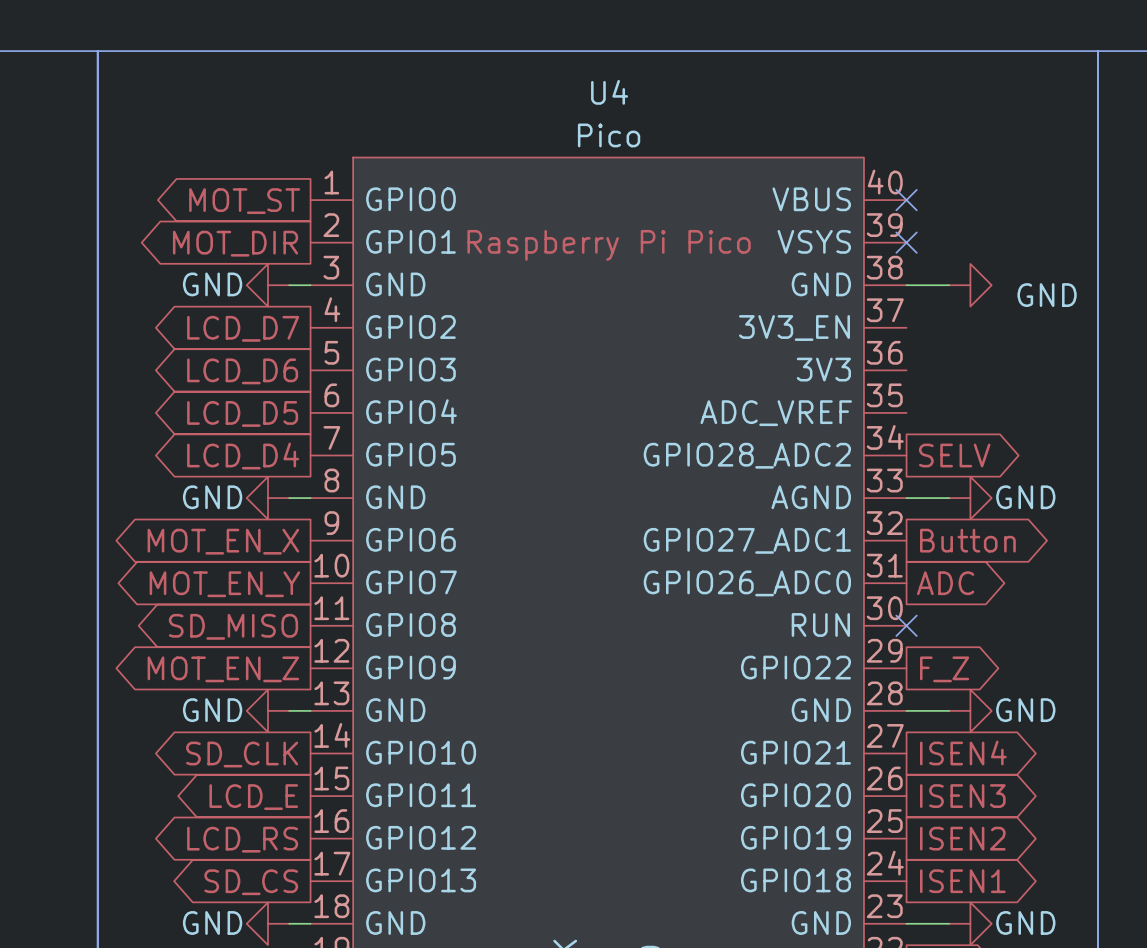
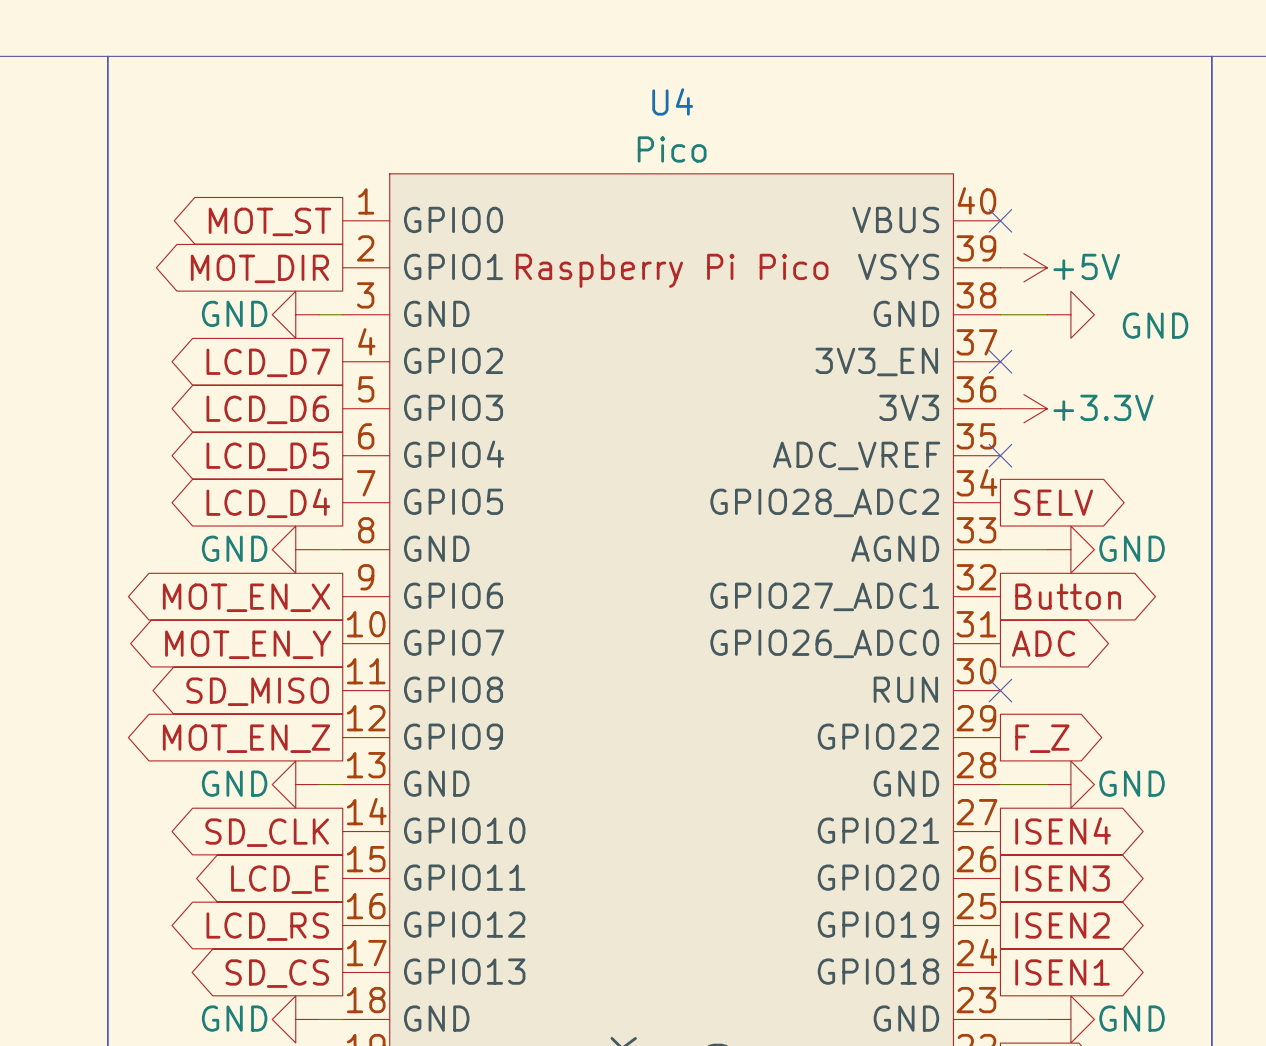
no-connect mark: (906, 242) -> none
power symbol: none -> +5V (1023, 267)
no-connect mark: none -> (1000, 361)
power symbol: none -> +3.3V (1023, 408)
no-connect mark: none -> (1000, 455)

